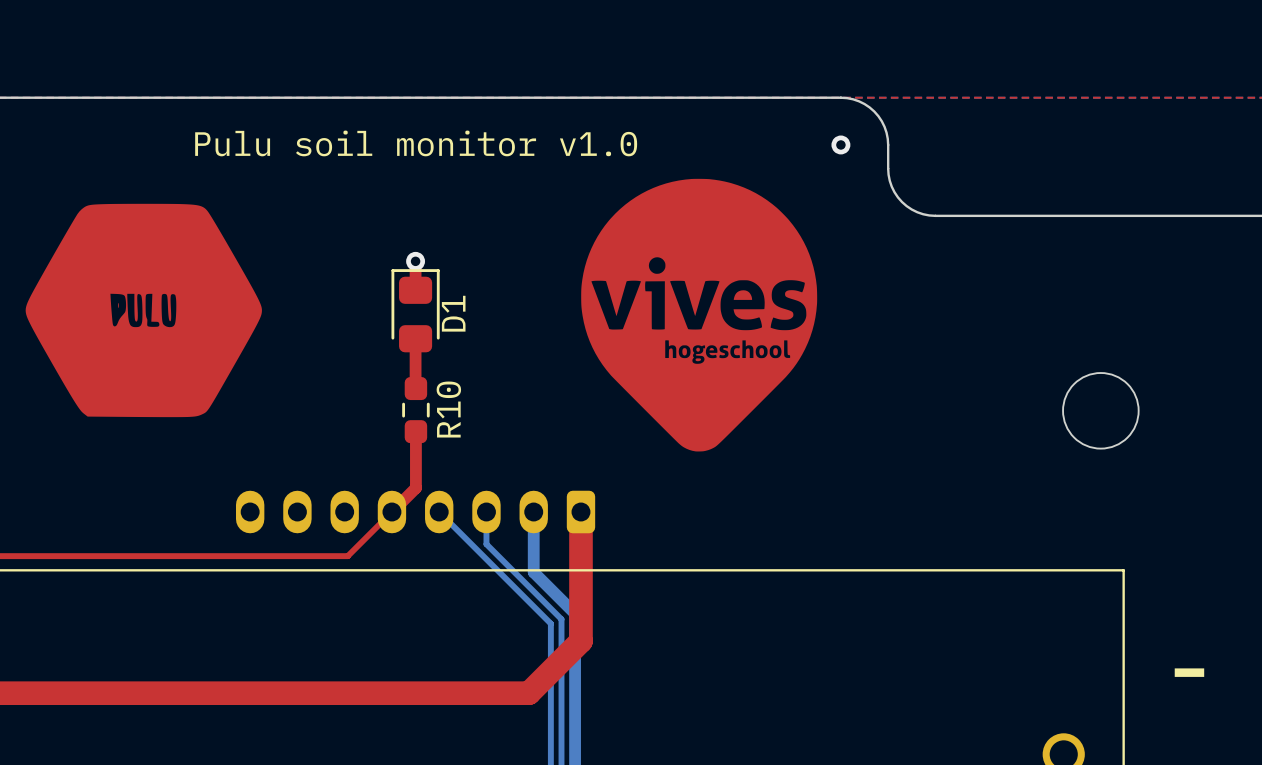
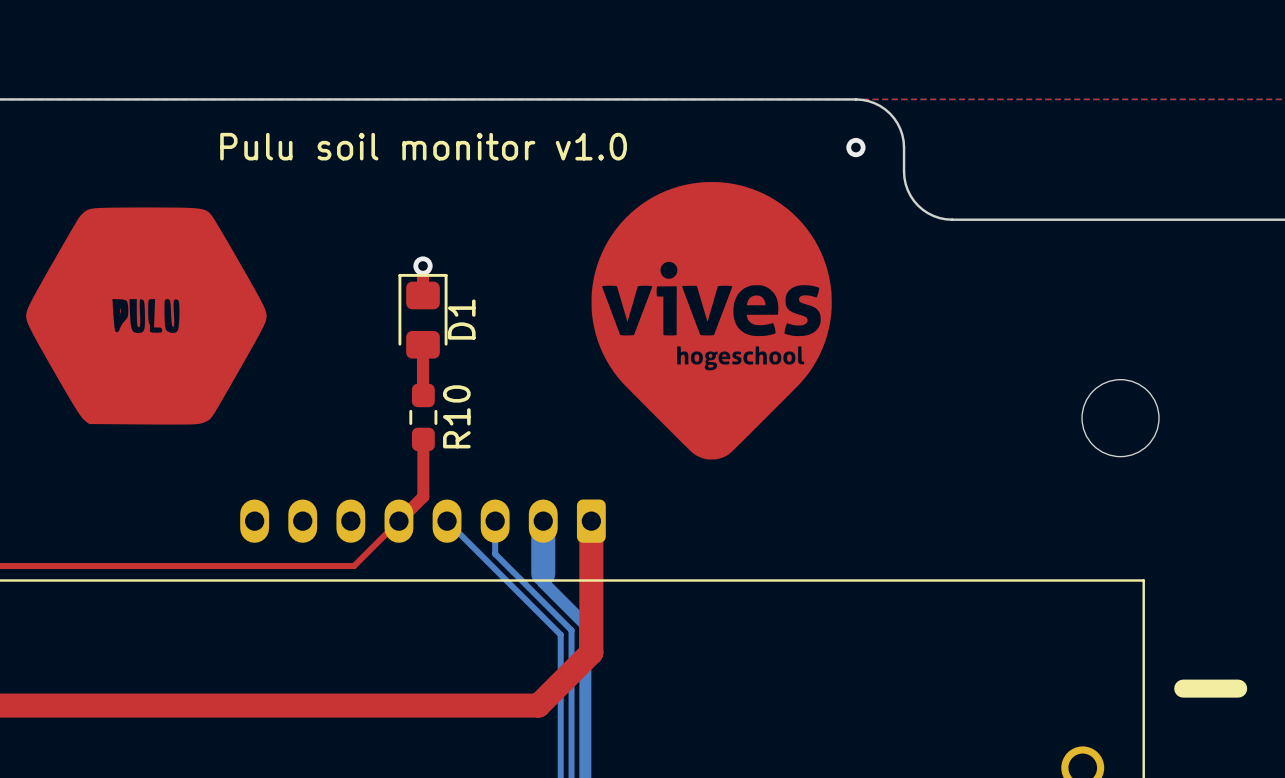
bottom track width: thin (533, 512) (533, 563) -> thick (543, 521) (543, 574)

